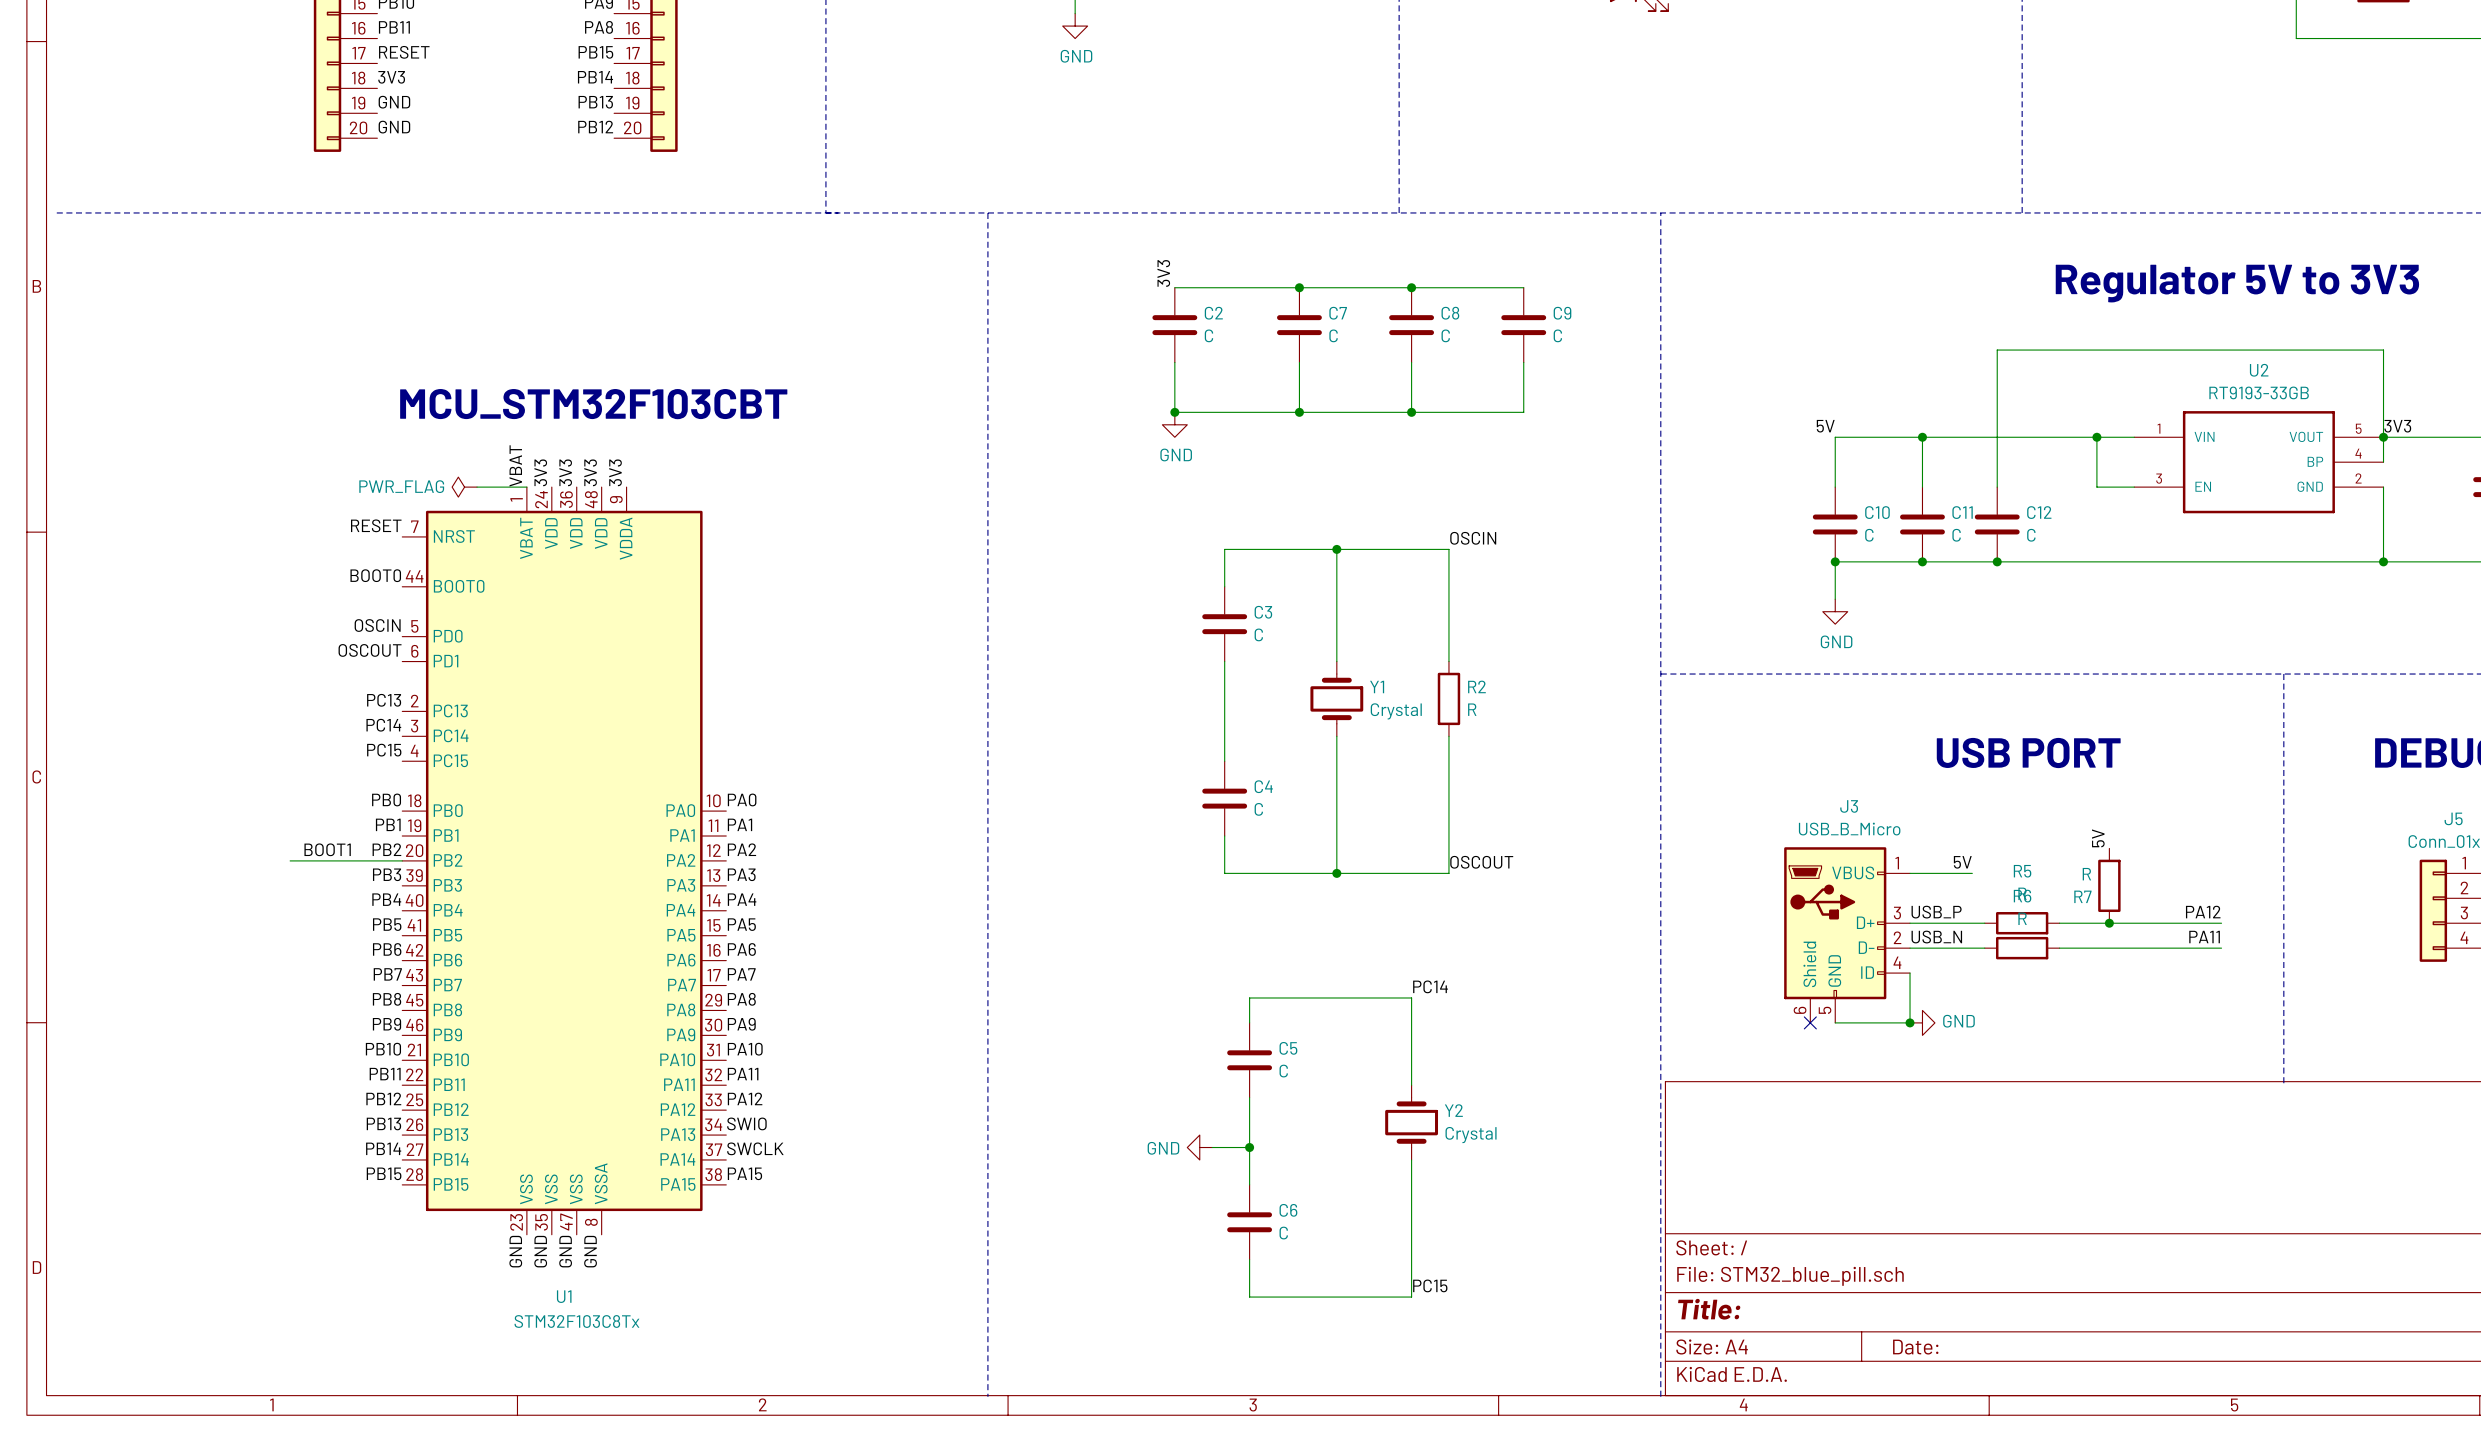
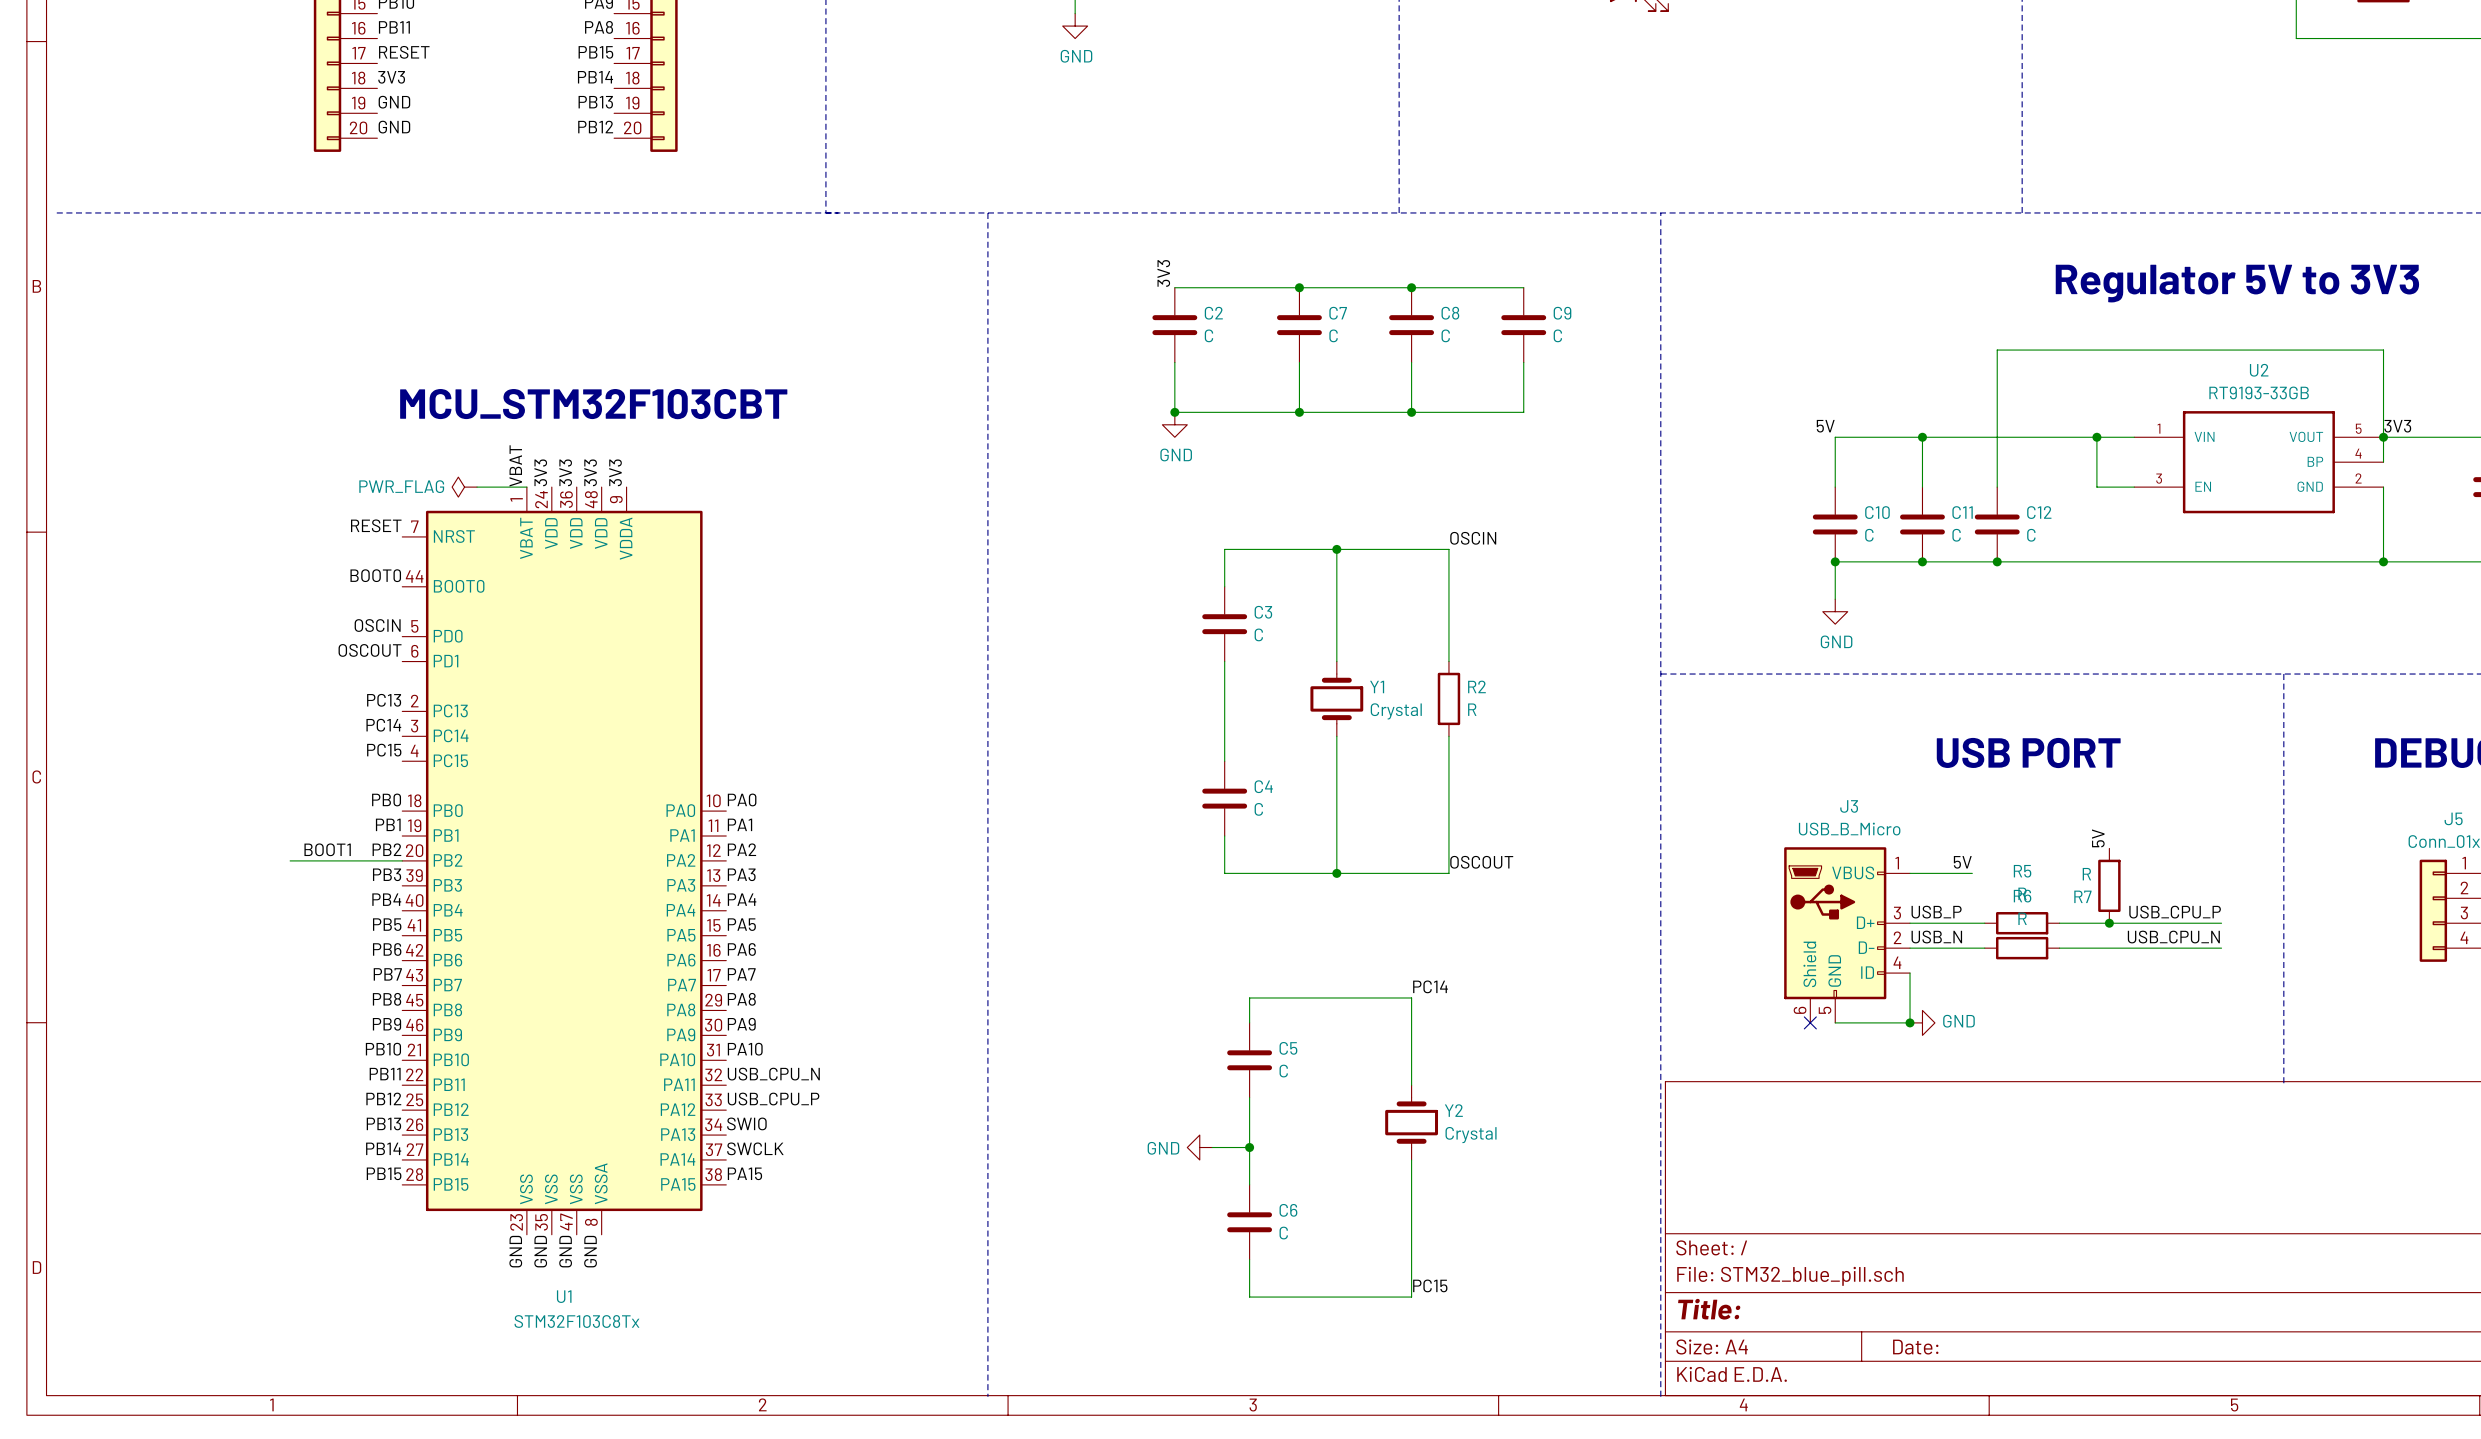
label: PA12 (2203, 912) -> USB_CPU_P (2175, 912)
label: PA11 (2204, 937) -> USB_CPU_N (2173, 937)
label: PA11 (743, 1074) -> USB_CPU_N (773, 1074)
label: PA12 (745, 1098) -> USB_CPU_P (773, 1099)

